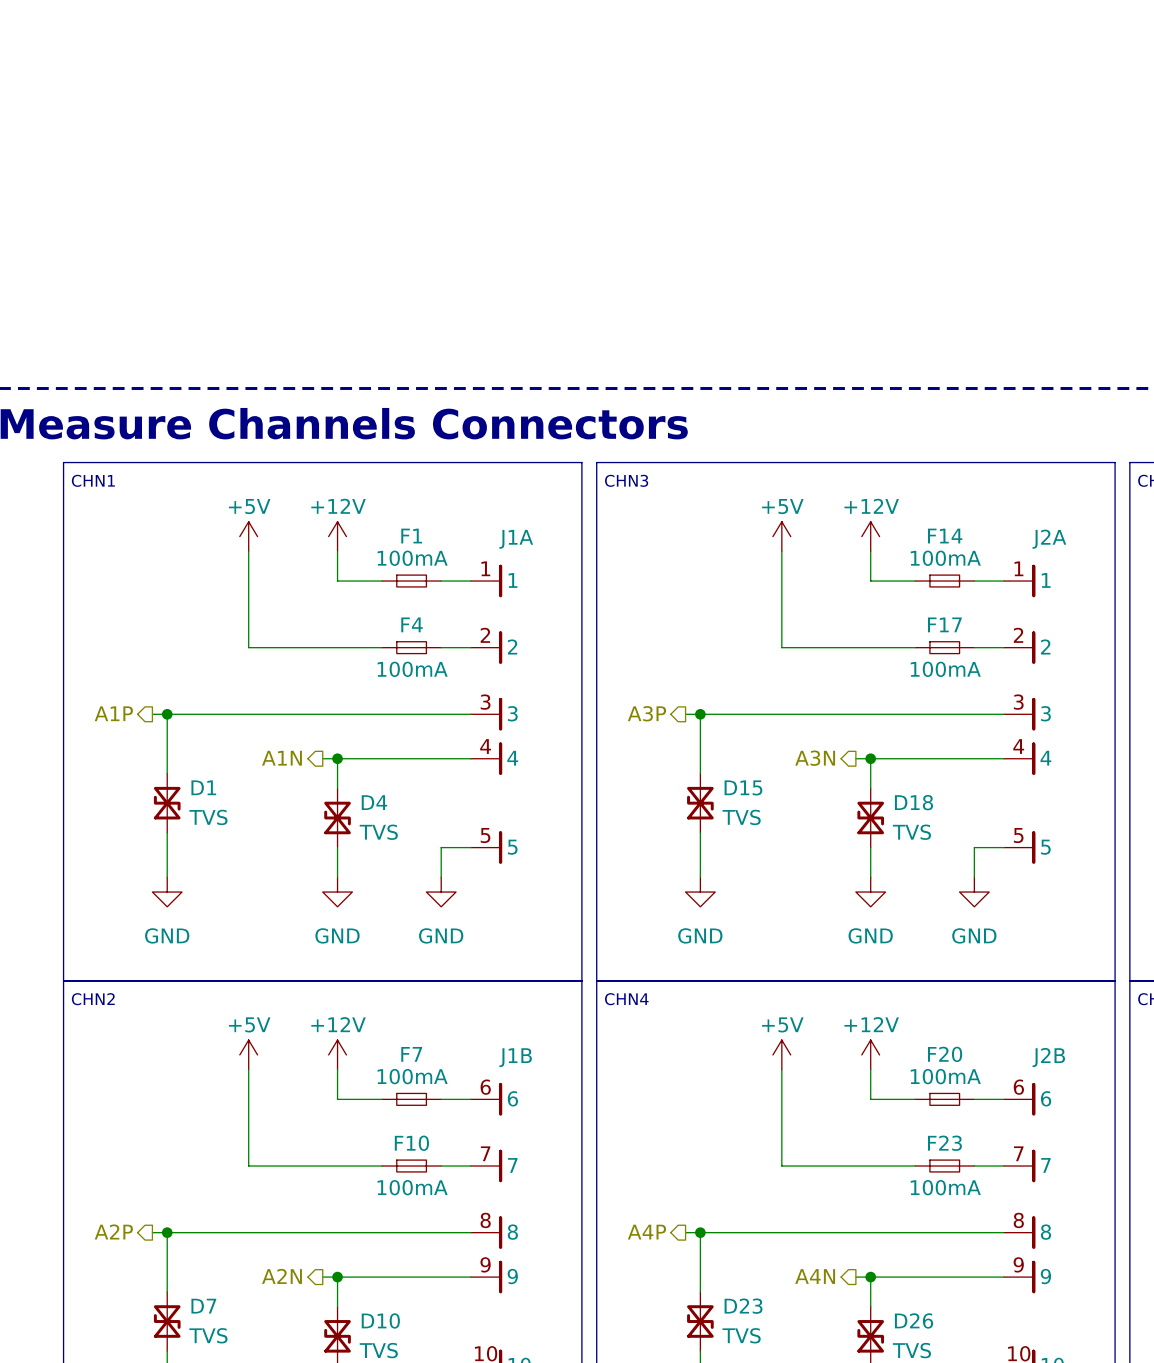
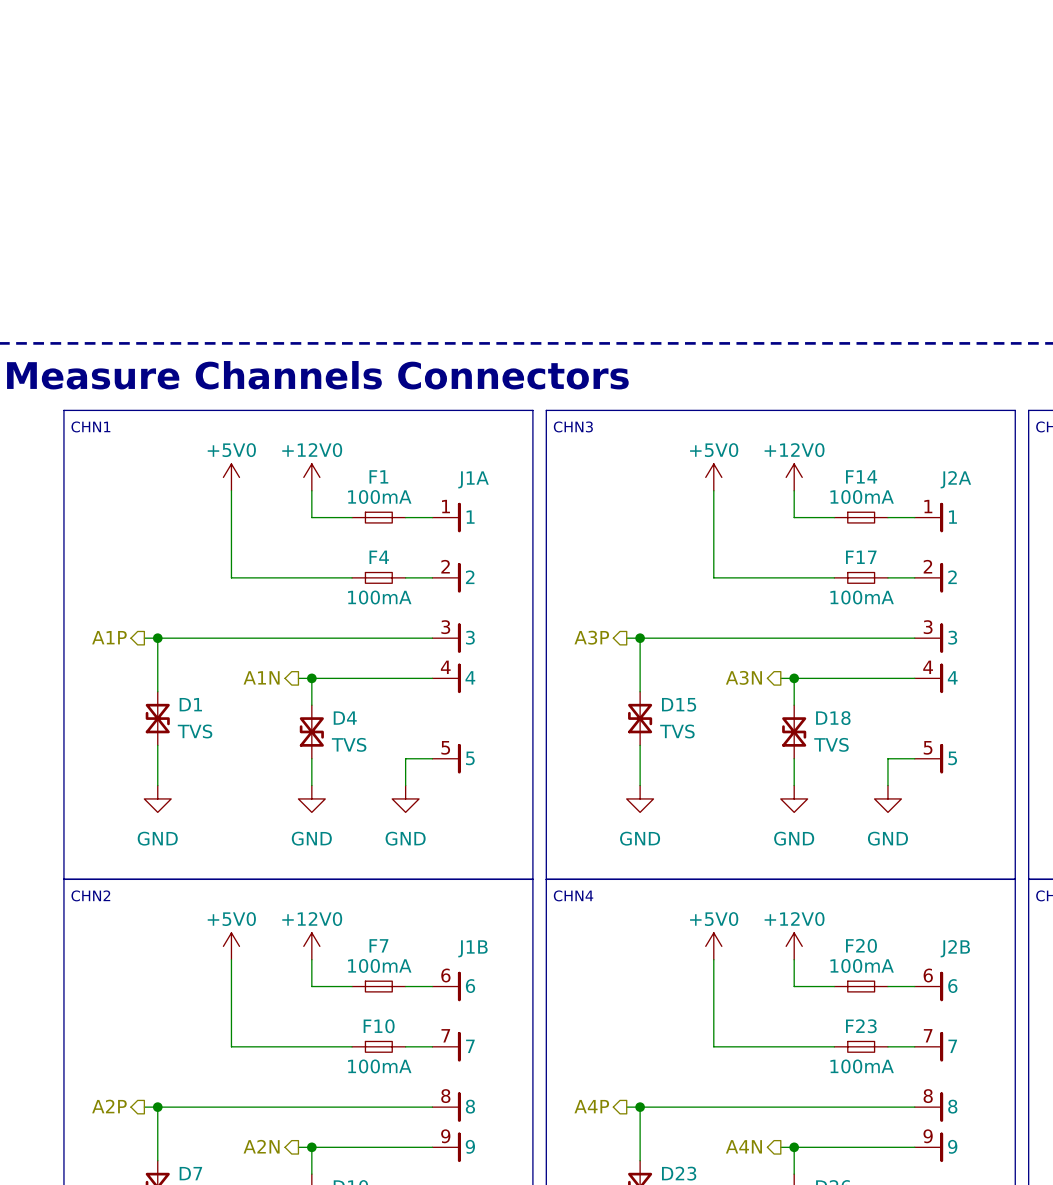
power symbol: +5V (248, 536) -> +5V0 (231, 477)
power symbol: +12V (337, 536) -> +12V0 (311, 477)
power symbol: +5V (781, 536) -> +5V0 (713, 477)
power symbol: +12V (870, 536) -> +12V0 (794, 477)
power symbol: +5V (248, 1054) -> +5V0 (231, 946)
power symbol: +12V (337, 1054) -> +12V0 (311, 946)
power symbol: +5V (781, 1054) -> +5V0 (713, 946)
power symbol: +12V (870, 1054) -> +12V0 (794, 946)

